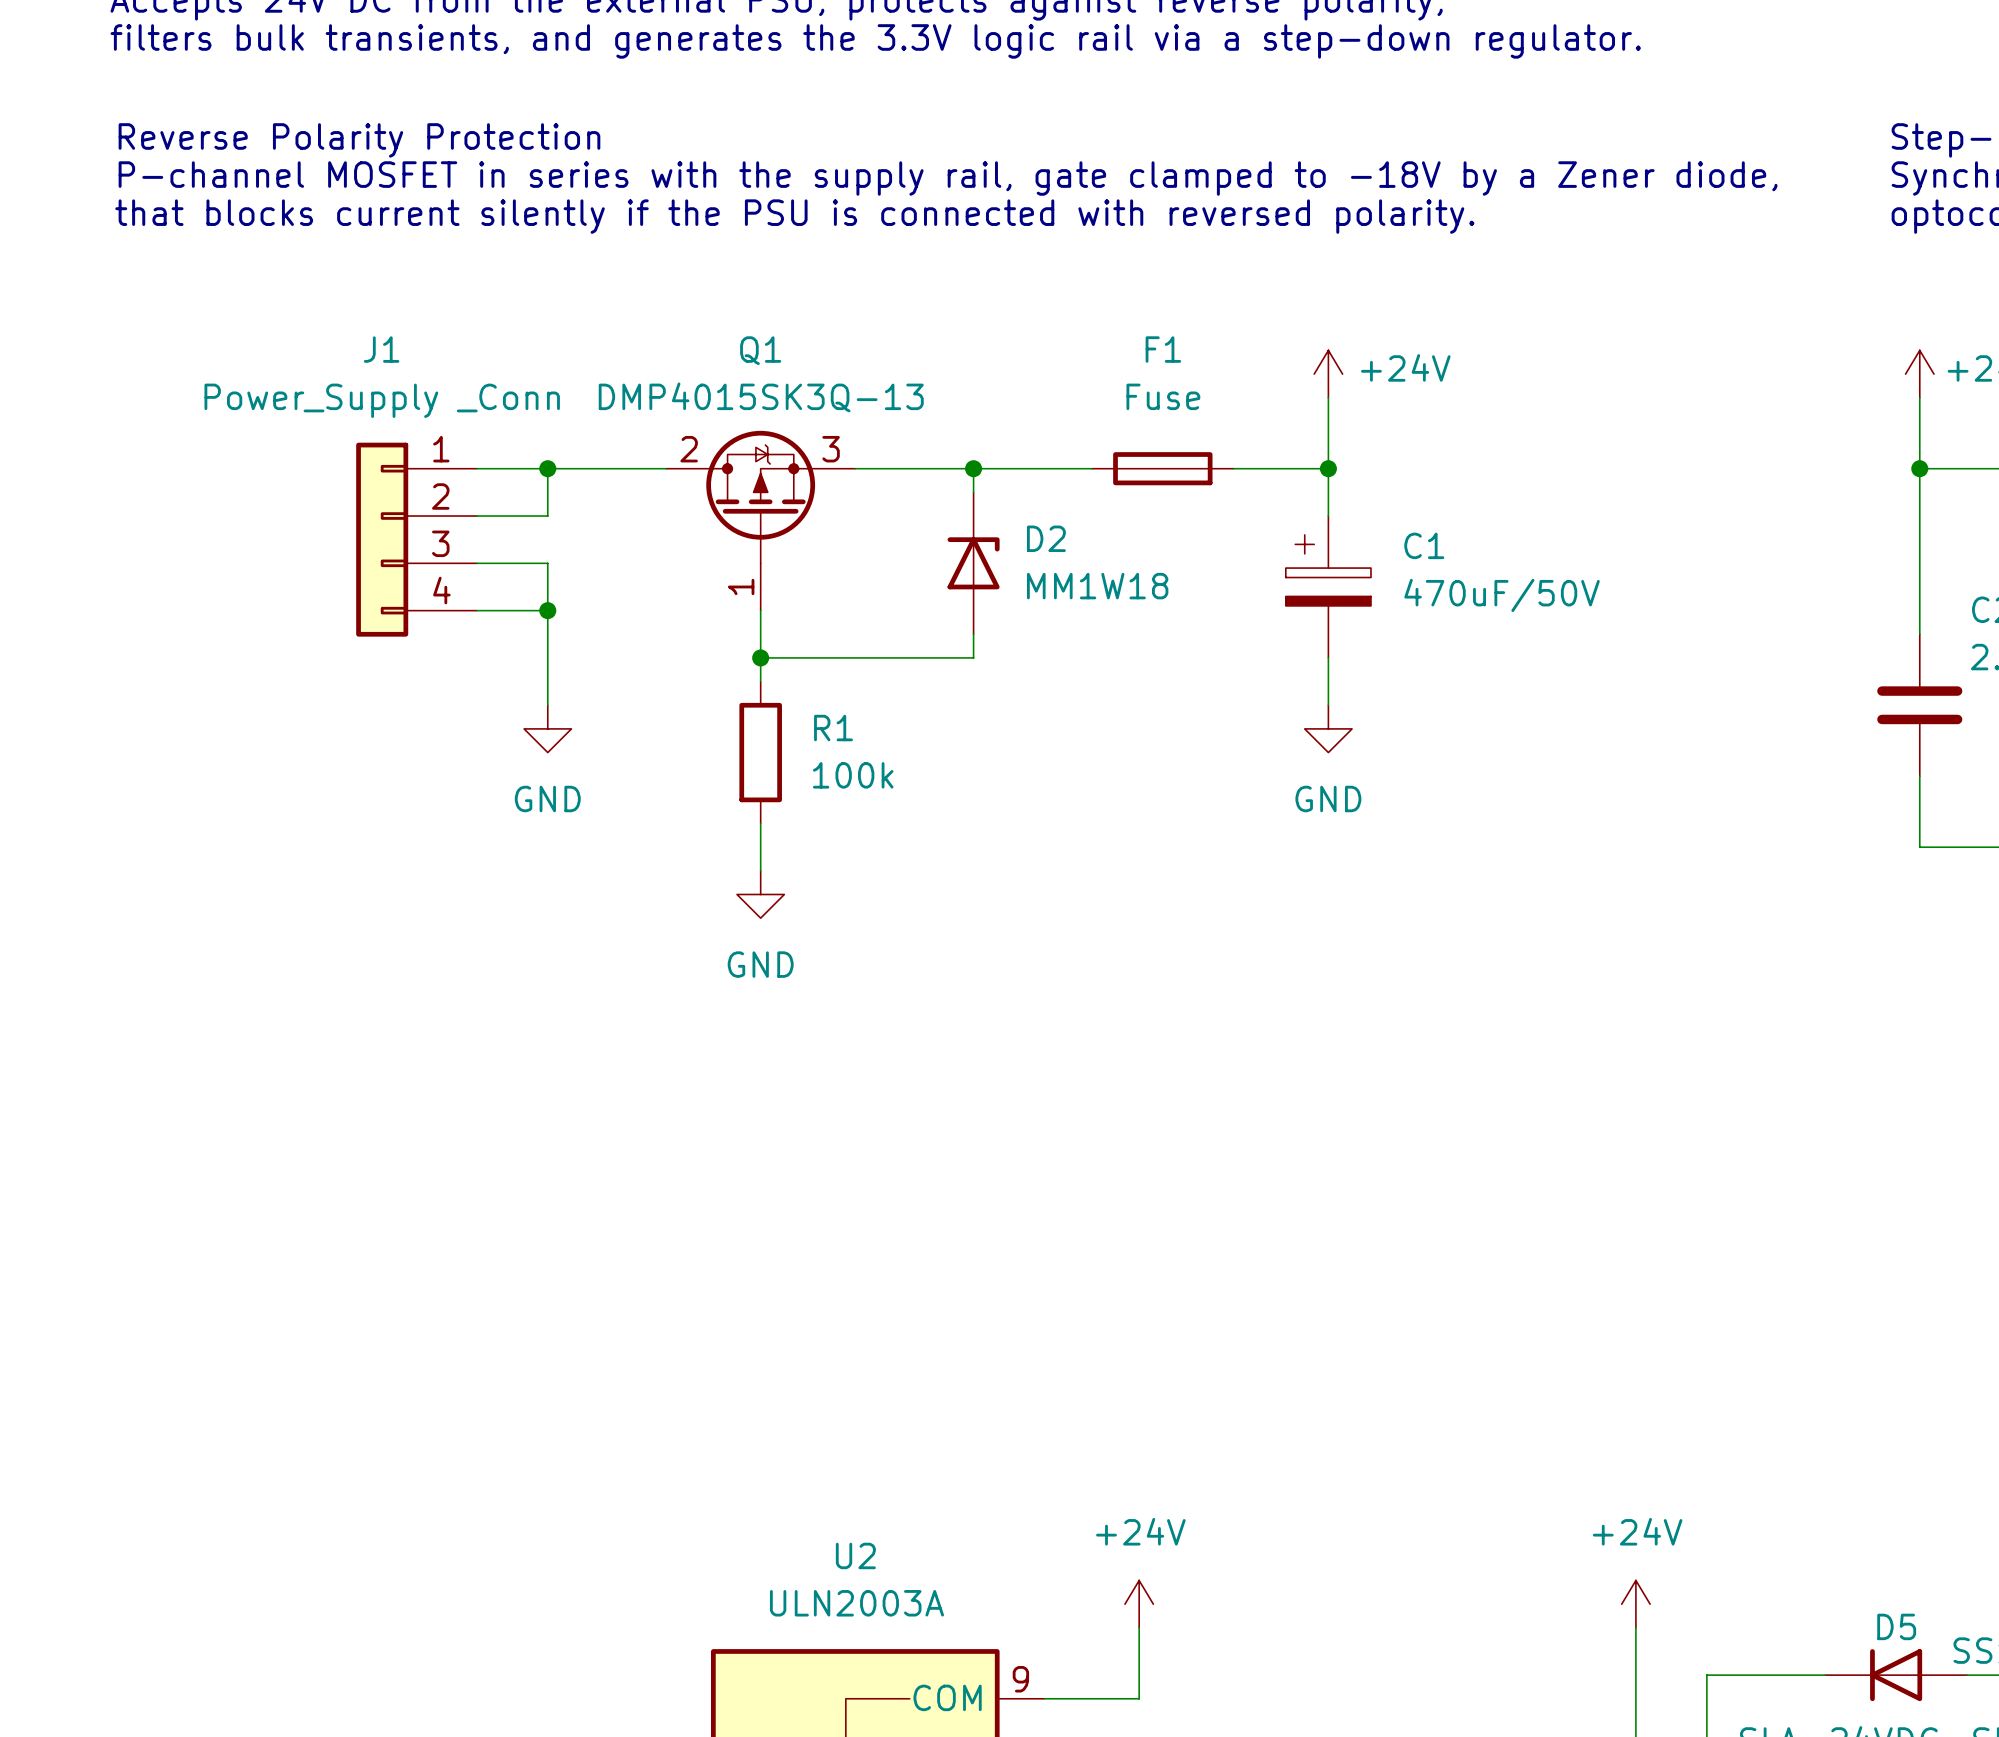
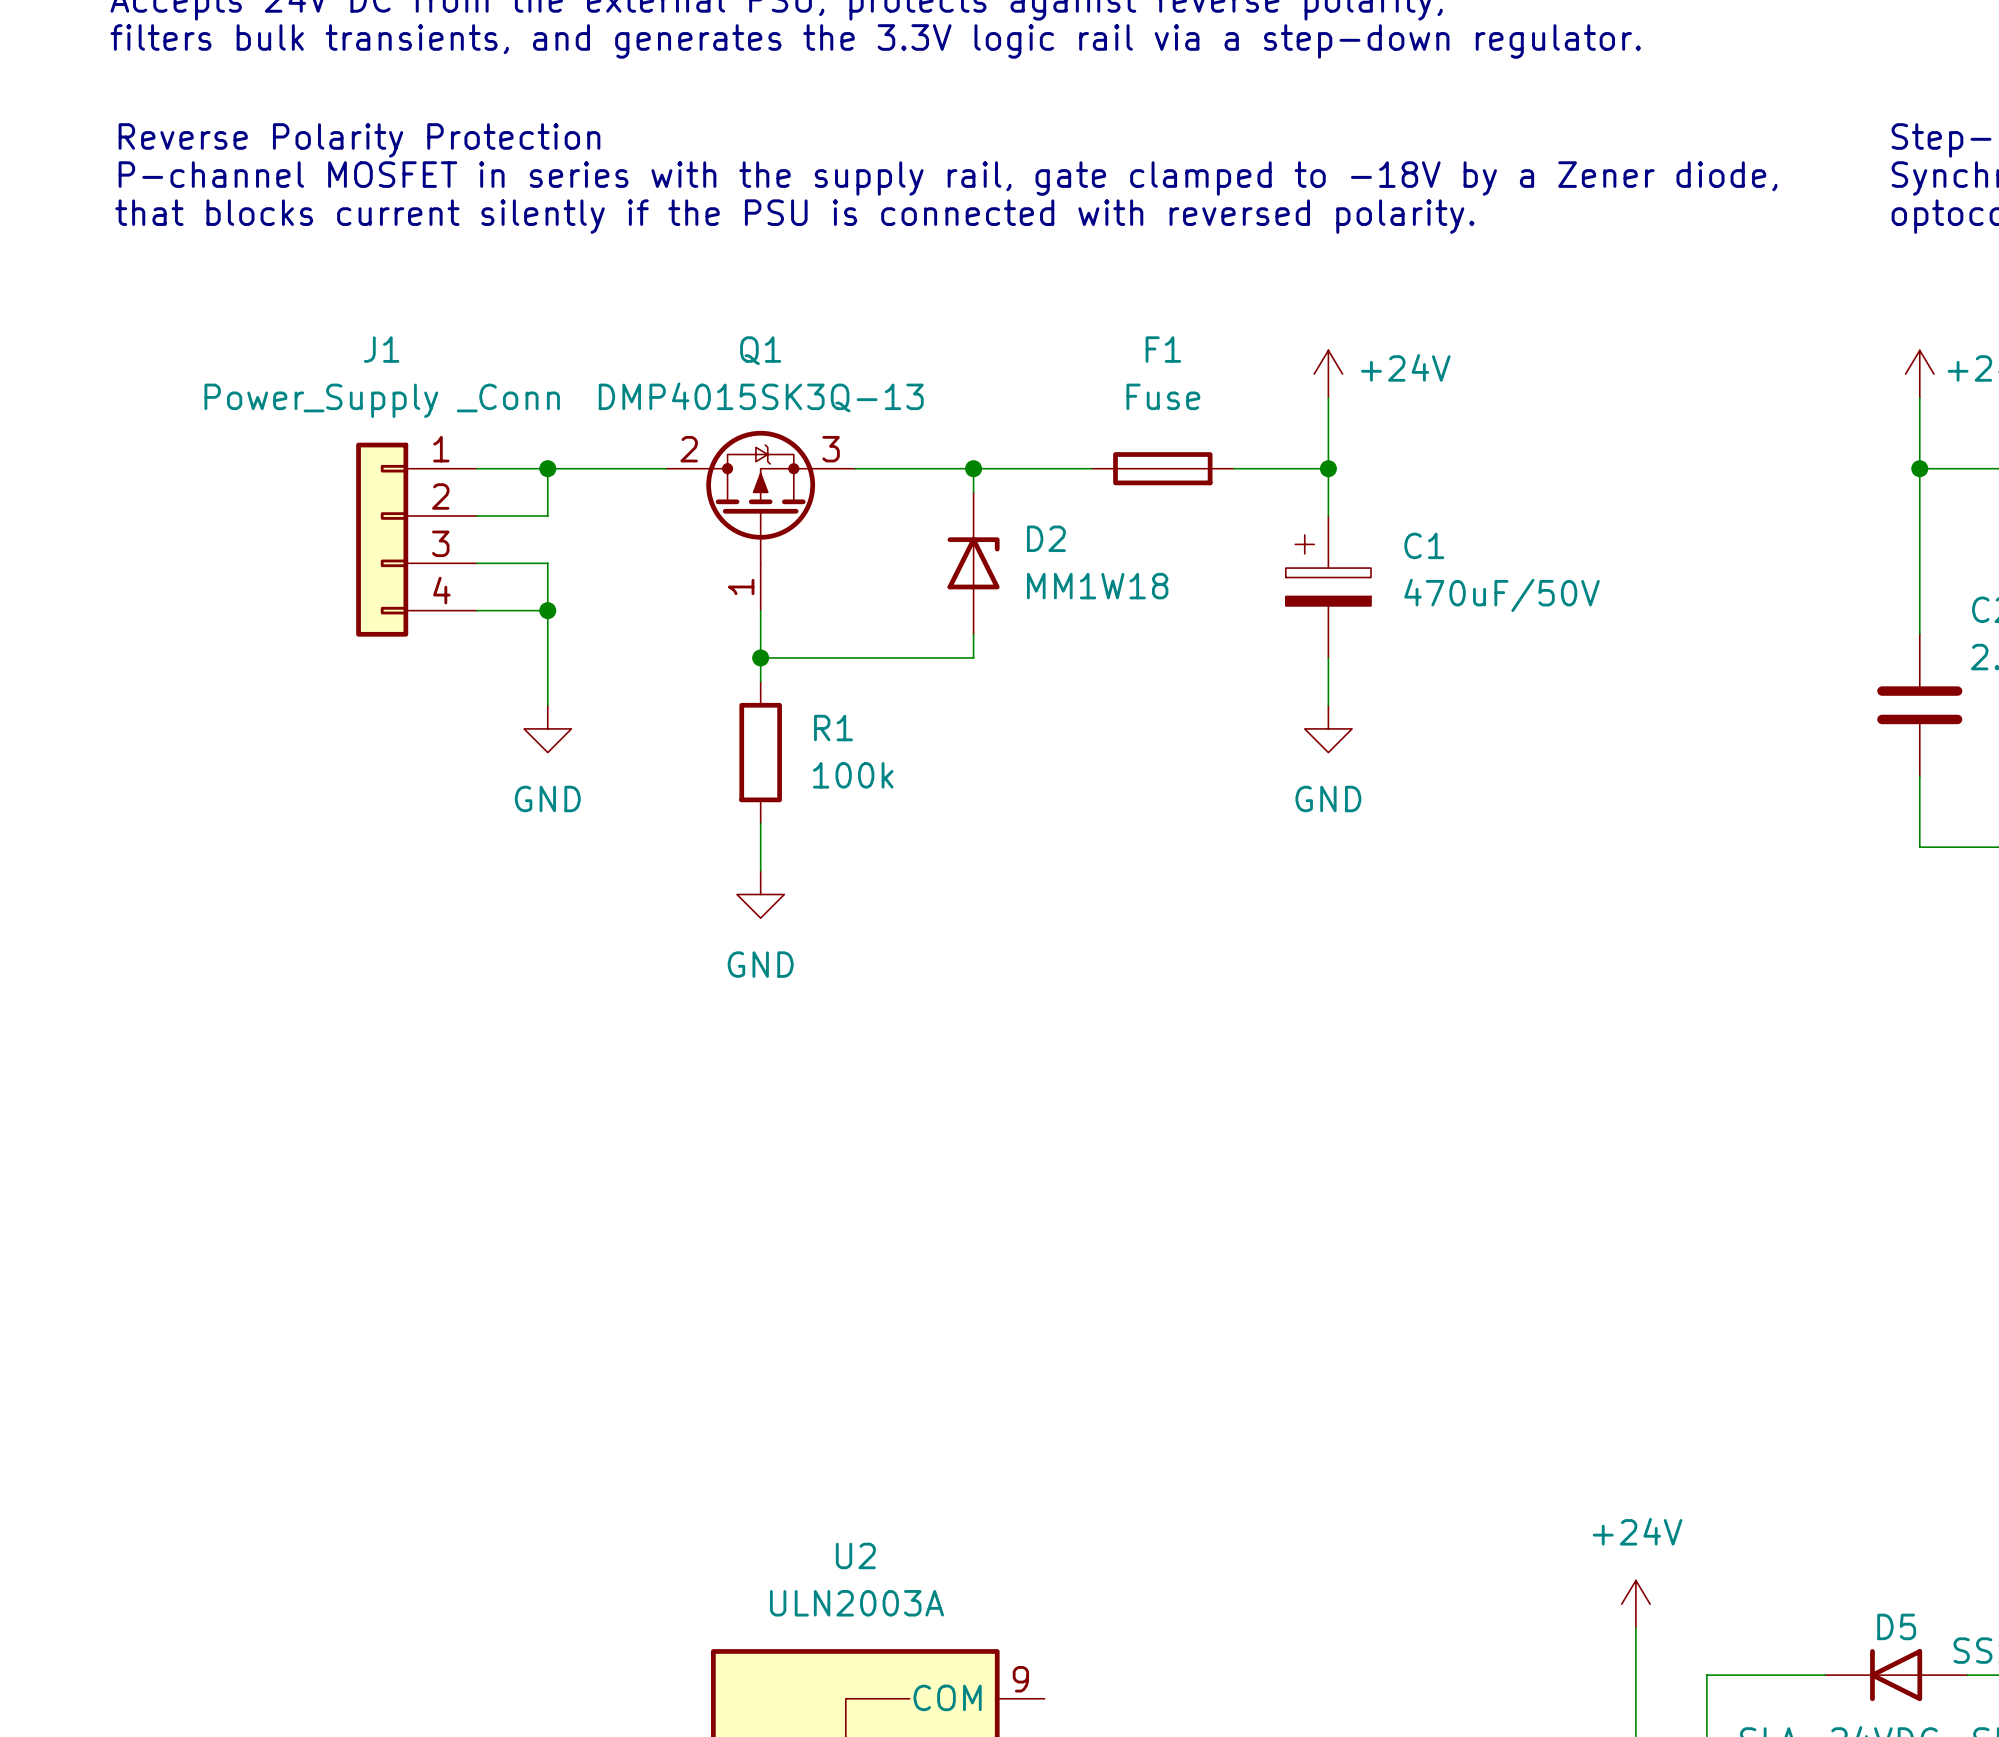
power symbol: +24V (1139, 1604) -> none
wire: (1139, 1627) (1139, 1698) (1044, 1698) -> none

